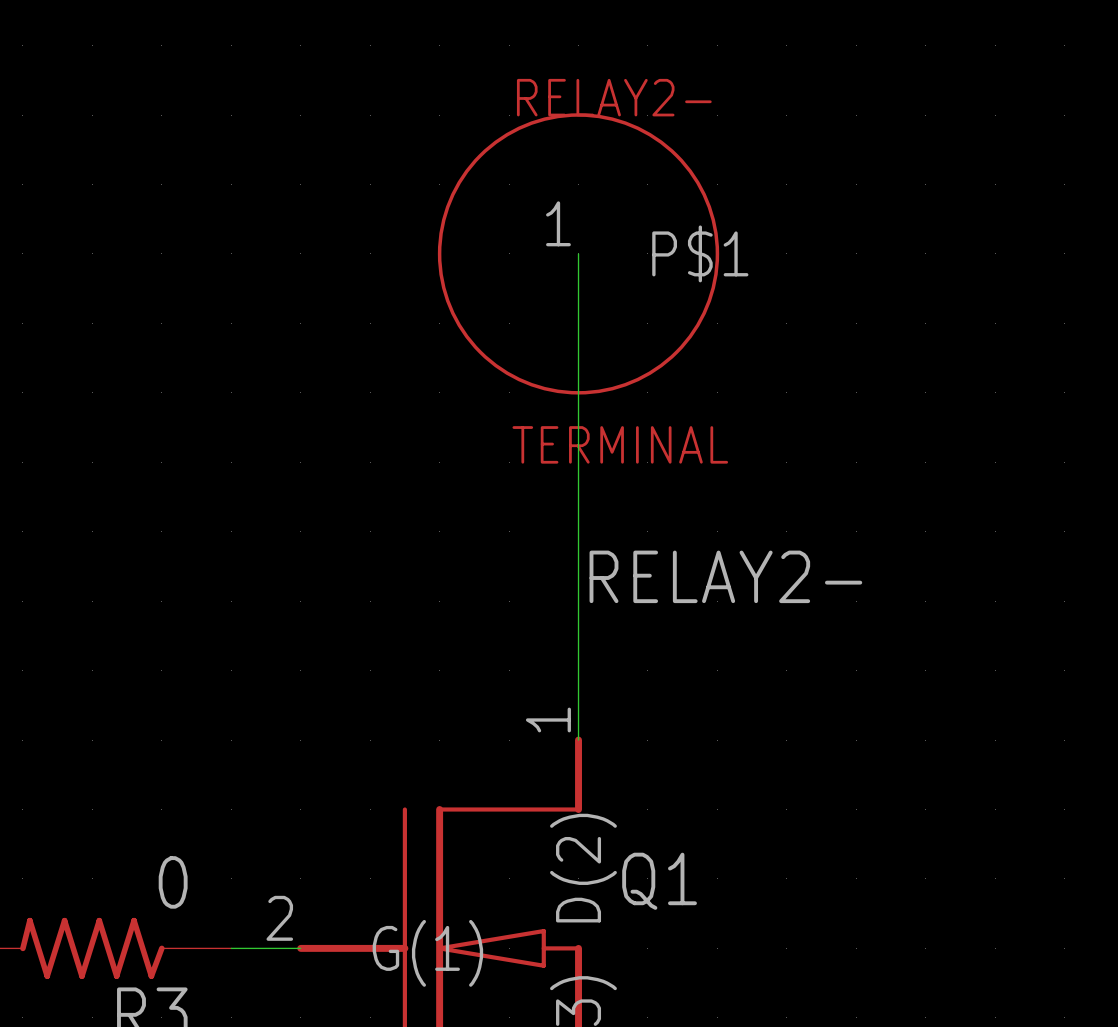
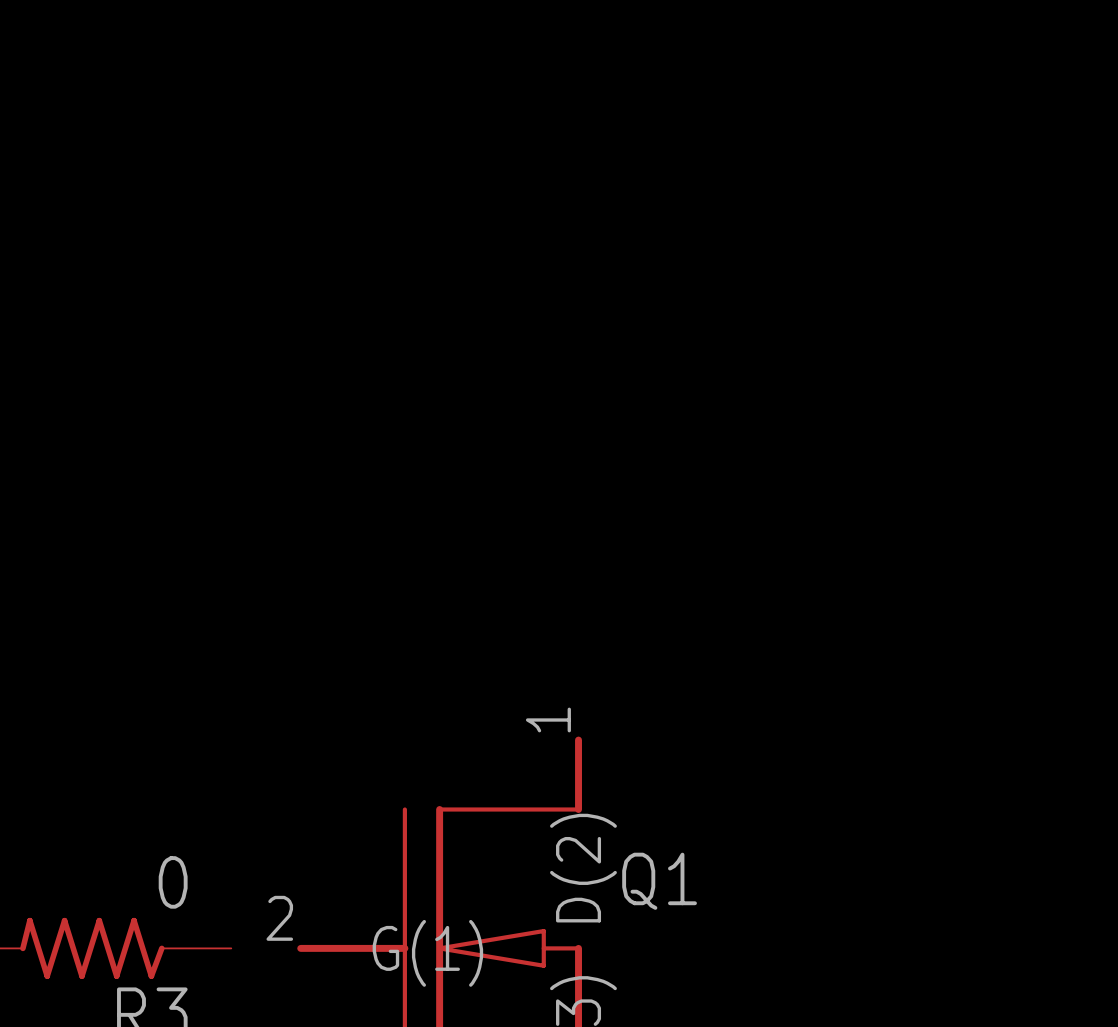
wire: (578, 253) (578, 740) -> none
RELAY2-: TERMINAL (578, 253) -> none
label: RELAY2- (725, 576) -> none
wire: (231, 948) (300, 948) -> none

